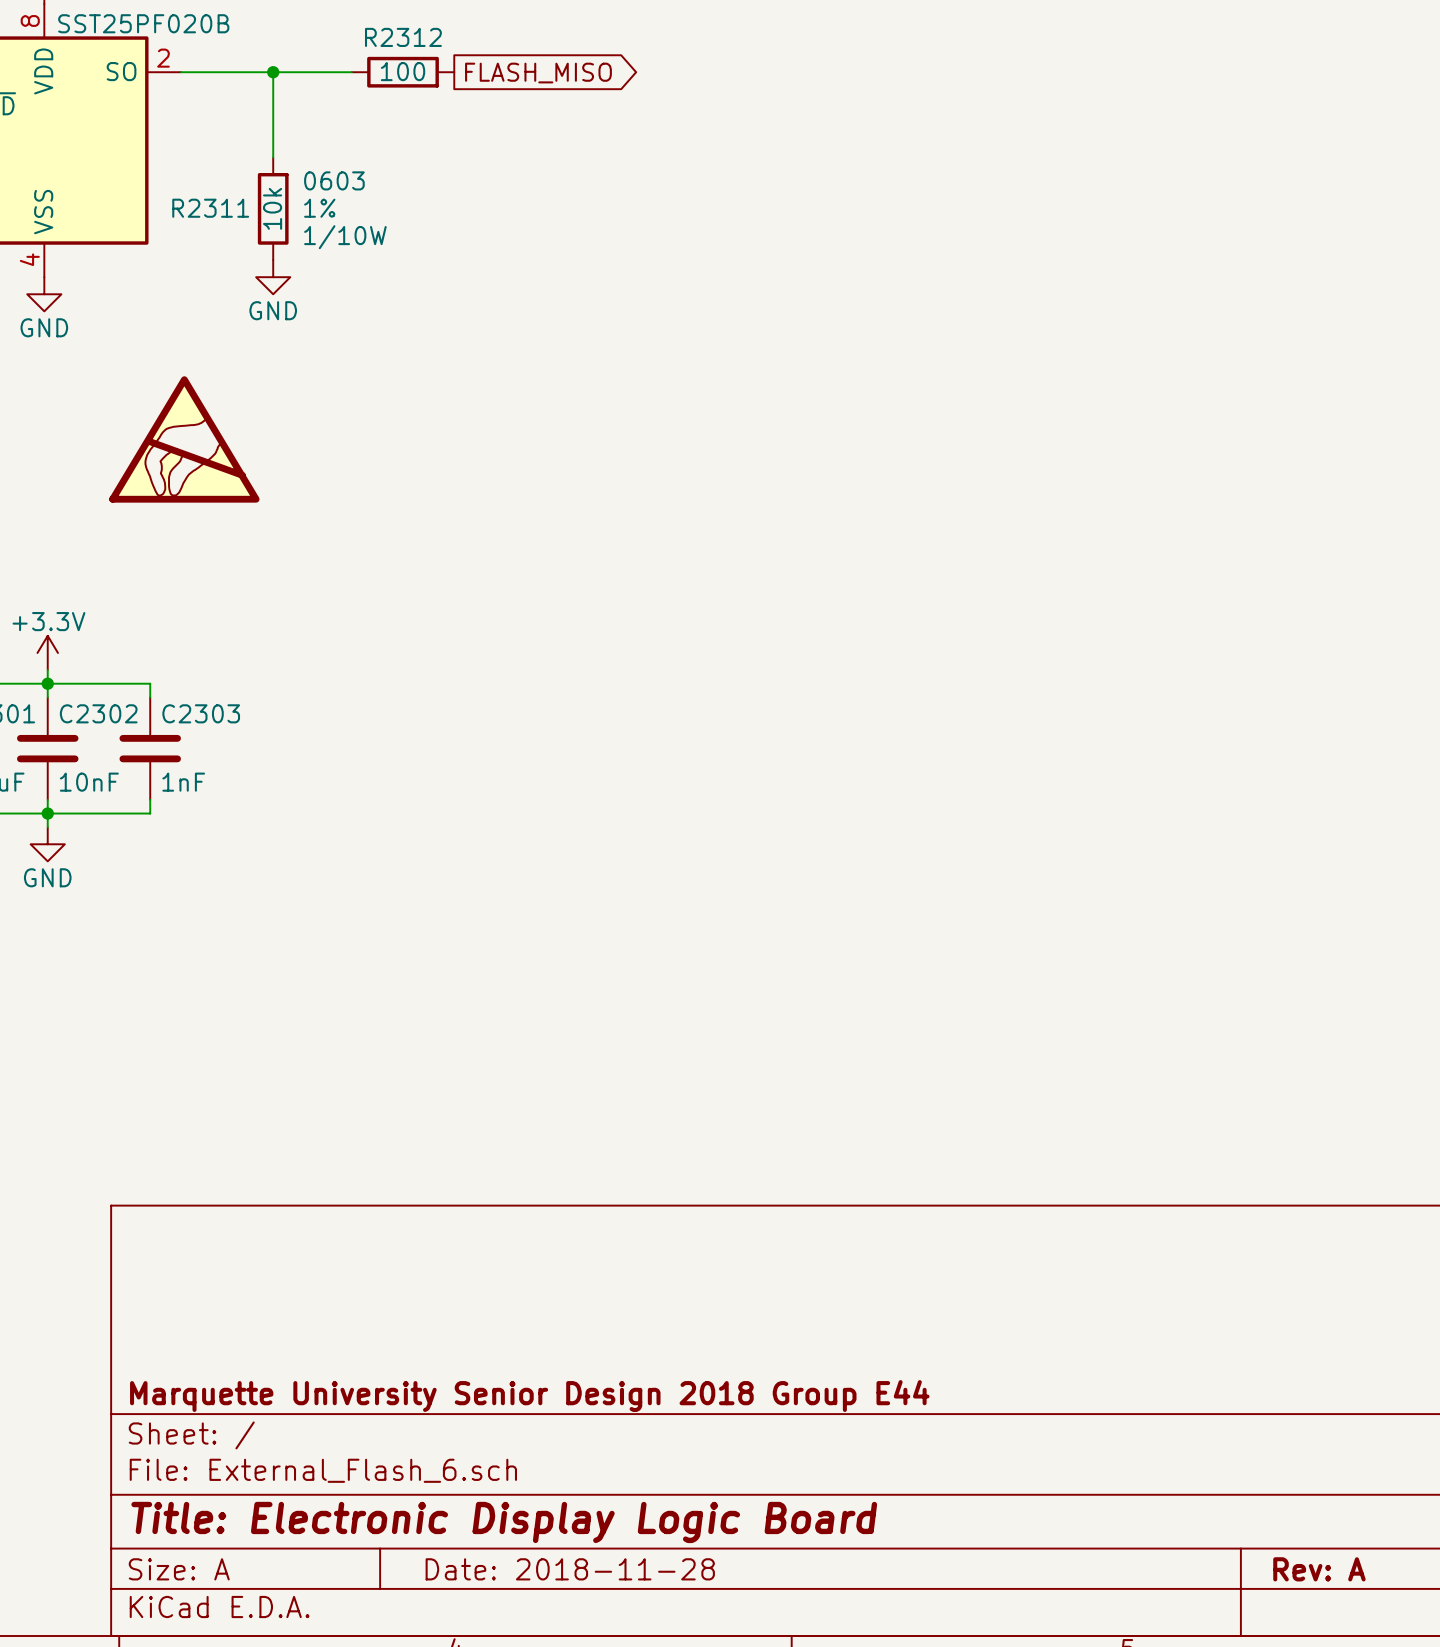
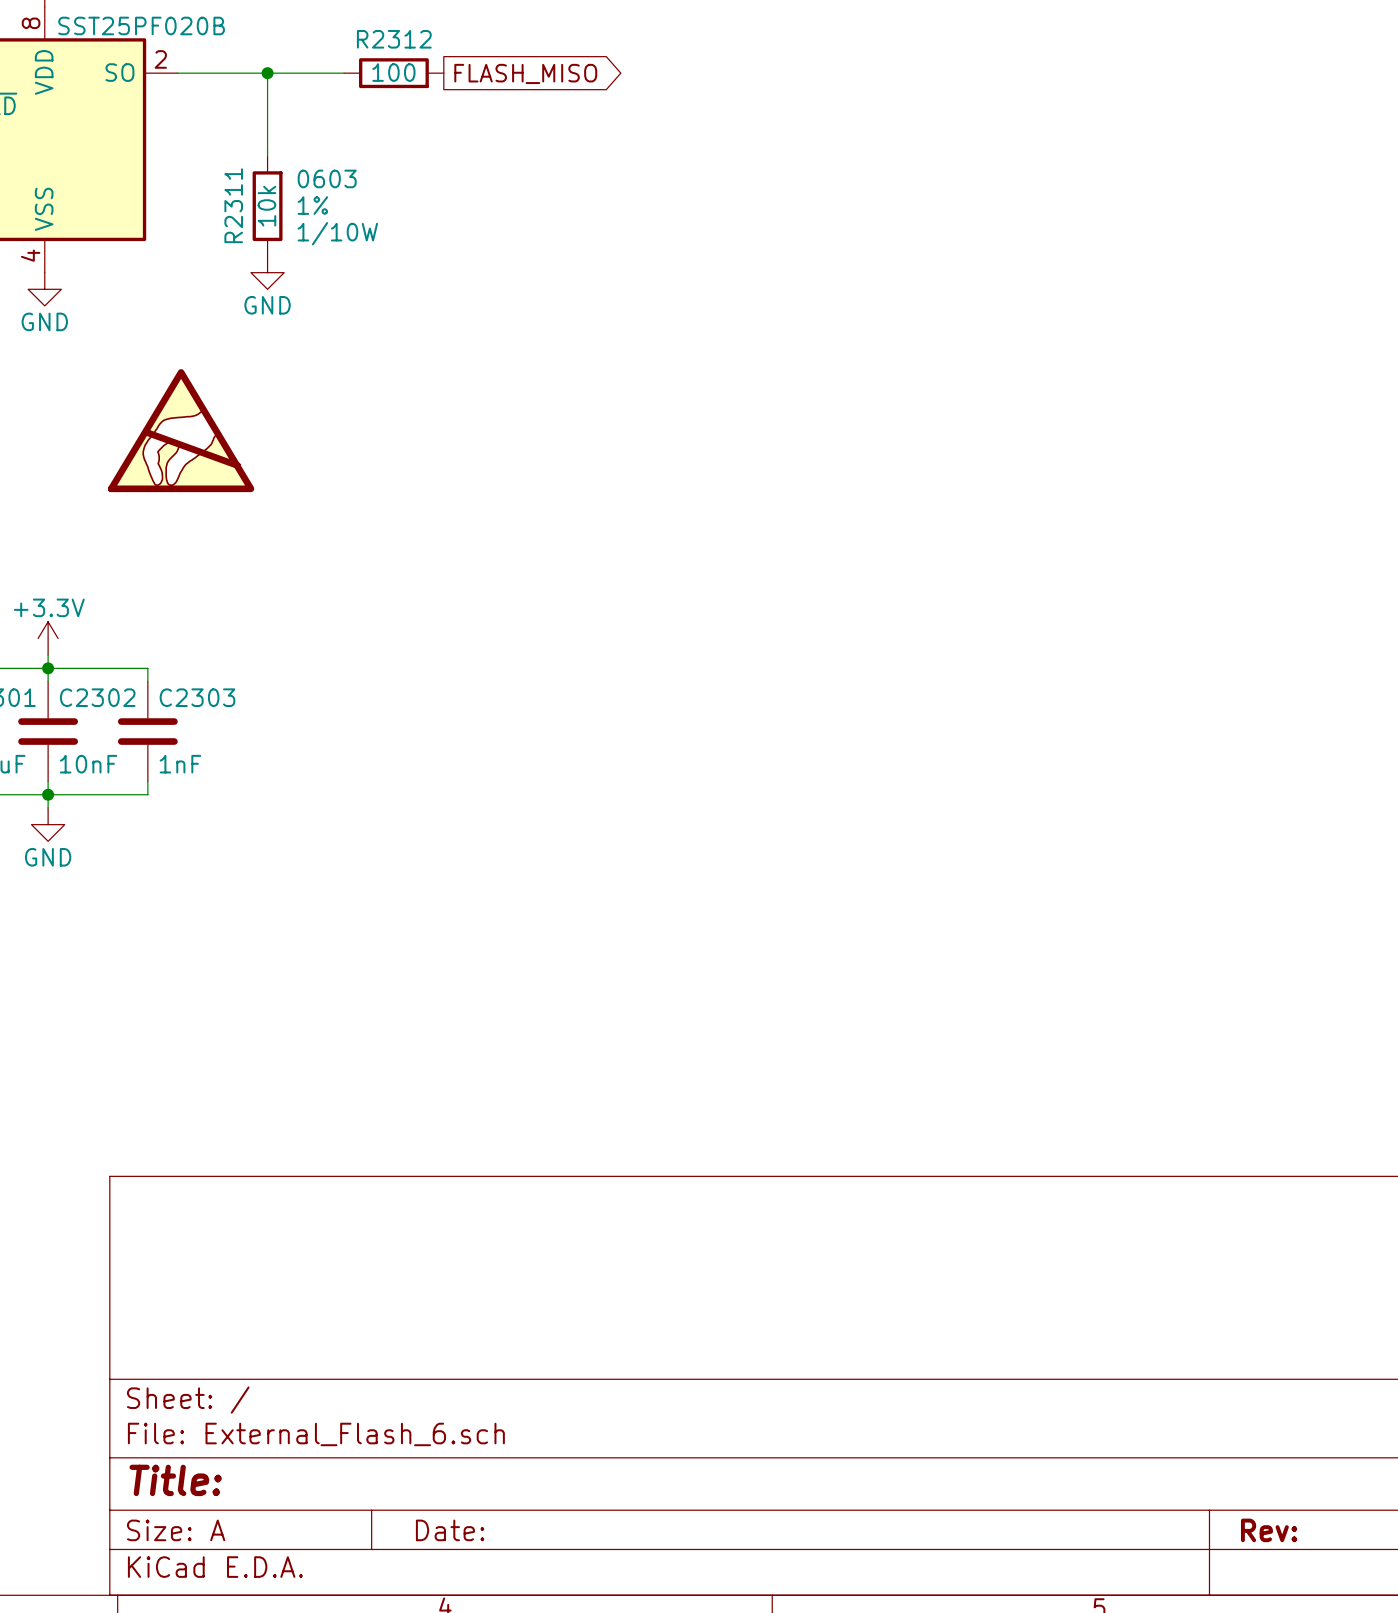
R2311 name rotation: 0° (210, 208) -> 90° counterclockwise (233, 205)
title block: Marquette University Senior Design 2018 Group E44 (529, 1396) -> none
title block: Title: Electronic Display Logic Board (504, 1522) -> Title: (175, 1480)
title block: Date: 2018-11-28 (570, 1569) -> Date: (450, 1530)
title block: Rev: A (1319, 1569) -> Rev: (1269, 1530)

